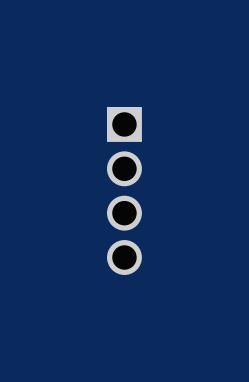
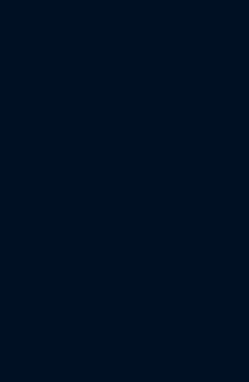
part: (124, 190) -> none

